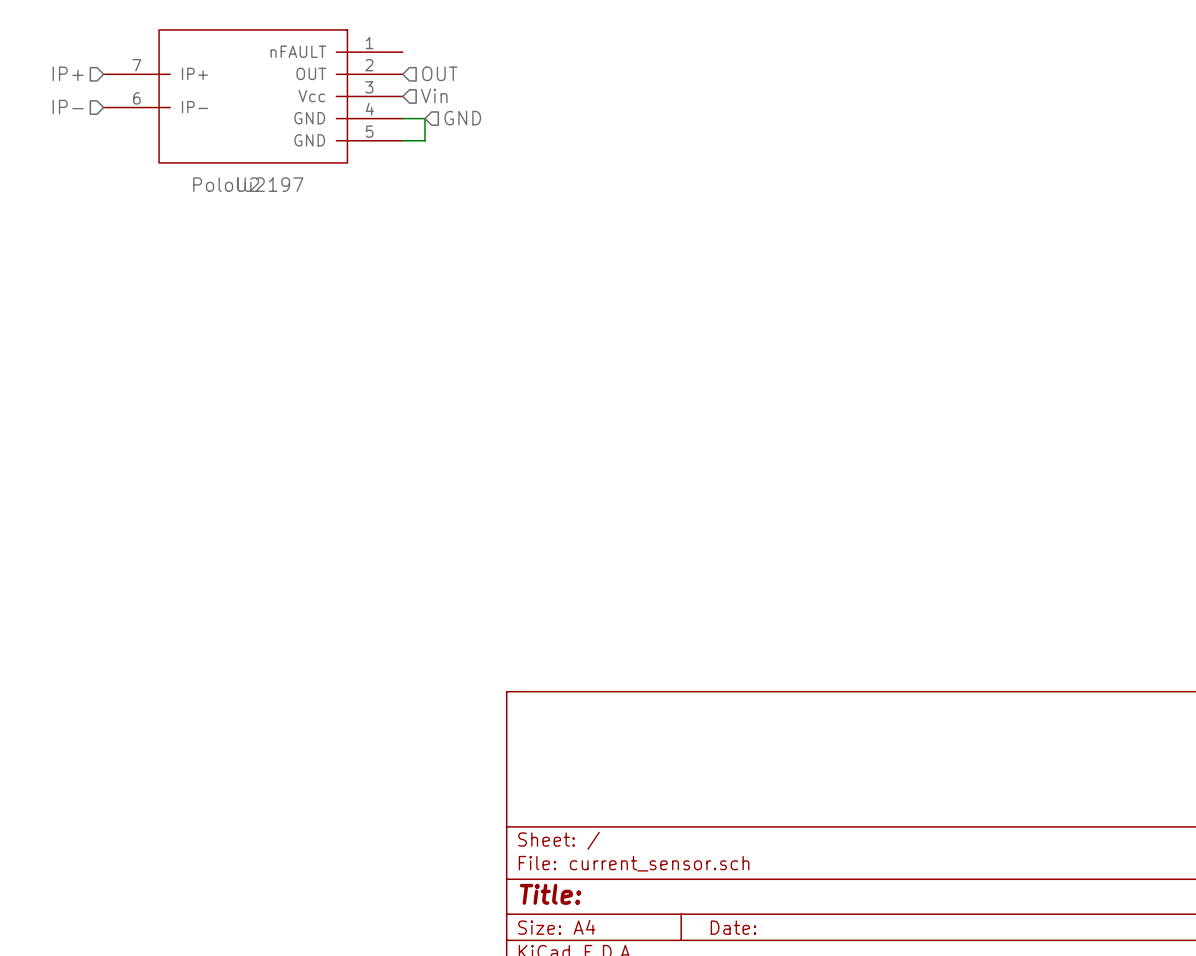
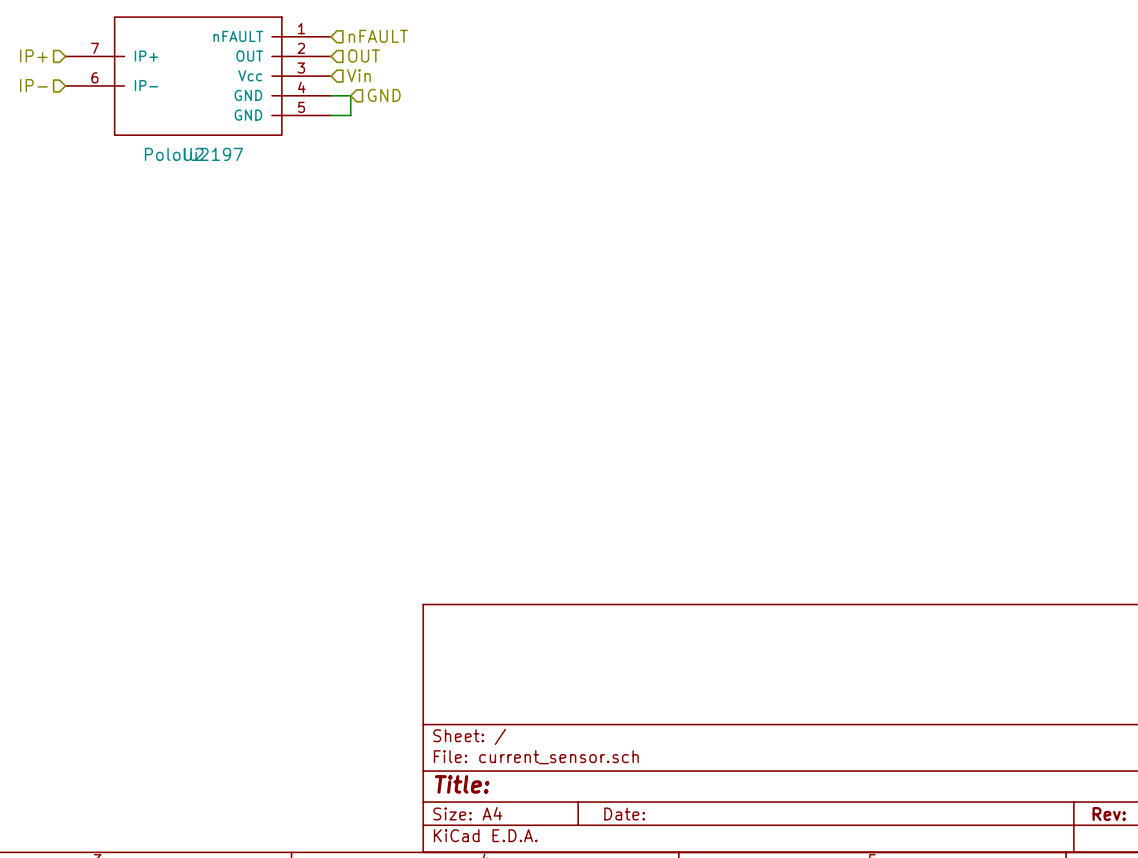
hierarchical label: none -> nFAULT (378, 36)

